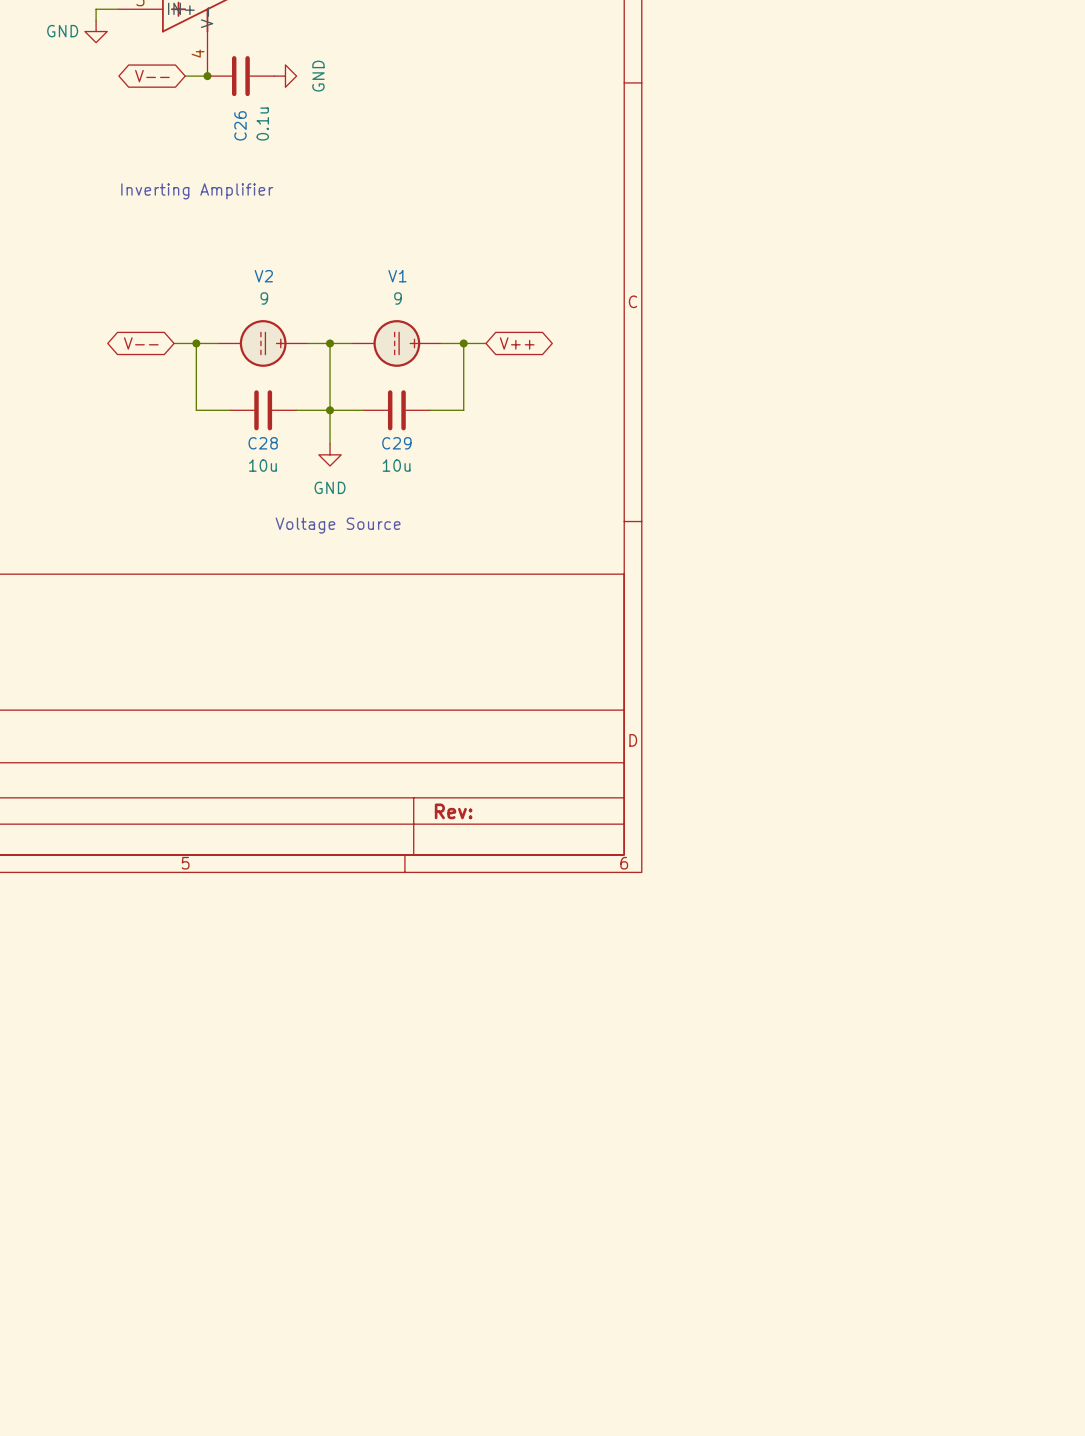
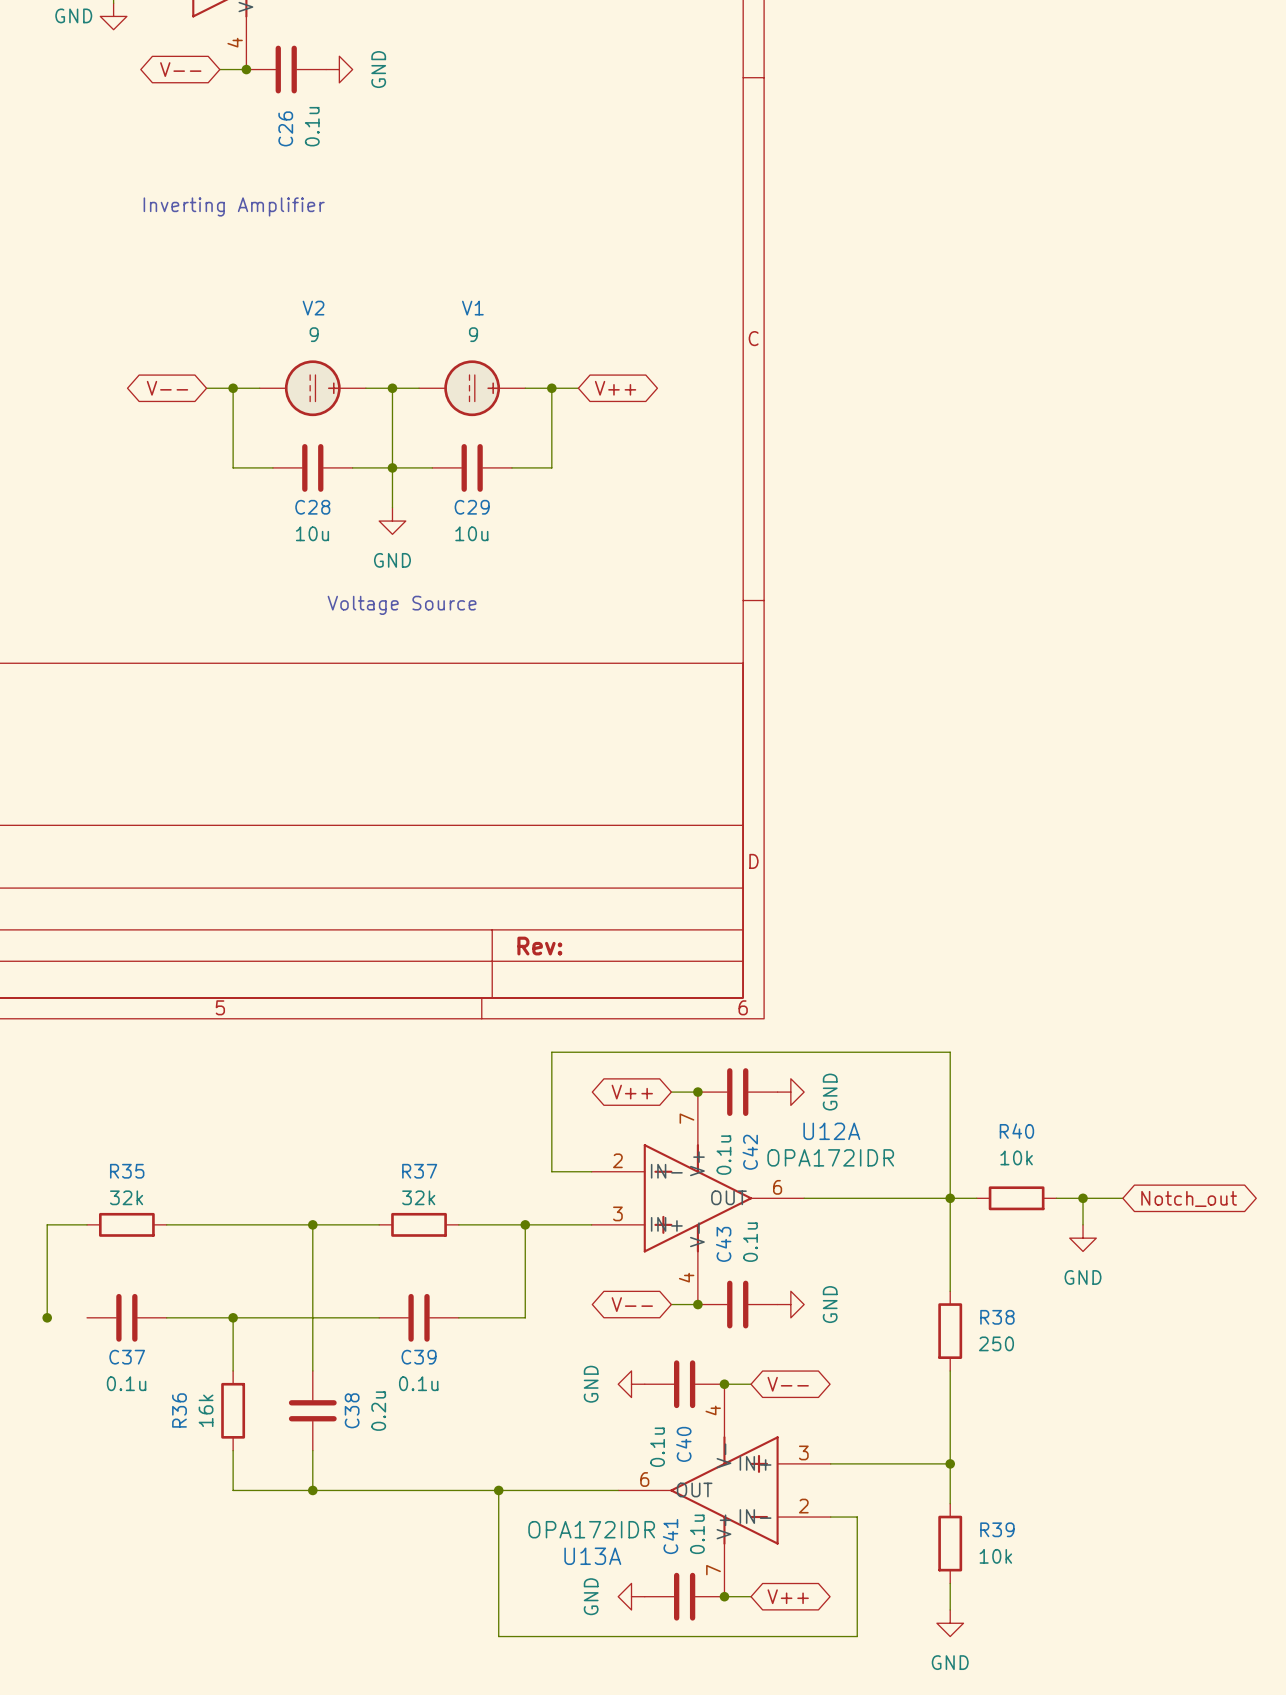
global label: none -> V++ (632, 1092)
wire: none -> (671, 1092) (697, 1092)
junction: none -> (697, 1092)
C42: none -> 0.1u (737, 1092)
power symbol: none -> GND (790, 1092)
wire: none -> (591, 1171) (551, 1171) (551, 1052) (950, 1052) (950, 1291)
U12A: none -> OPA172IDR (697, 1198)
wire: none -> (804, 1198) (976, 1198)
junction: none -> (950, 1198)
R40: none -> 10k (1016, 1198)
wire: none -> (1056, 1198) (1122, 1198)
wire: none -> (1083, 1198) (1083, 1224)
junction: none -> (1083, 1198)
global label: none -> Notch_out (1189, 1198)
wire: none -> (87, 1224) (47, 1224) (47, 1317)
R35: none -> 32k (126, 1224)
wire: none -> (166, 1224) (379, 1224)
wire: none -> (312, 1224) (312, 1370)
junction: none -> (312, 1224)
R37: none -> 32k (419, 1224)
wire: none -> (458, 1224) (591, 1224)
wire: none -> (525, 1224) (525, 1317) (458, 1317)
junction: none -> (525, 1224)
power symbol: none -> GND (1083, 1238)
global label: none -> V-- (632, 1304)
wire: none -> (671, 1304) (697, 1304)
junction: none -> (697, 1304)
C43: none -> 0.1u (737, 1304)
power symbol: none -> GND (790, 1304)
junction: none -> (47, 1317)
C37: none -> 0.1u (126, 1317)
wire: none -> (166, 1317) (379, 1317)
wire: none -> (233, 1317) (233, 1370)
junction: none -> (233, 1317)
C39: none -> 0.1u (419, 1317)
R38: none -> 250 (950, 1331)
wire: none -> (950, 1370) (950, 1503)
power symbol: none -> GND (631, 1384)
C40: none -> 0.1u (684, 1384)
wire: none -> (724, 1384) (751, 1384)
junction: none -> (724, 1384)
global label: none -> V-- (788, 1384)
R36: none -> 16k (233, 1410)
C38: none -> 0.2u (312, 1410)
wire: none -> (233, 1450) (233, 1490) (618, 1490)
wire: none -> (312, 1450) (312, 1490)
wire: none -> (830, 1463) (950, 1463)
junction: none -> (950, 1463)
junction: none -> (312, 1490)
wire: none -> (498, 1490) (498, 1636) (857, 1636) (857, 1517) (830, 1517)
junction: none -> (498, 1490)
U13A: none -> OPA172IDR (724, 1490)
R39: none -> 10k (950, 1543)
wire: none -> (950, 1583) (950, 1609)
power symbol: none -> GND (631, 1596)
C41: none -> 0.1u (684, 1596)
wire: none -> (724, 1596) (751, 1596)
junction: none -> (724, 1596)
global label: none -> V++ (788, 1596)
power symbol: none -> GND (950, 1623)

